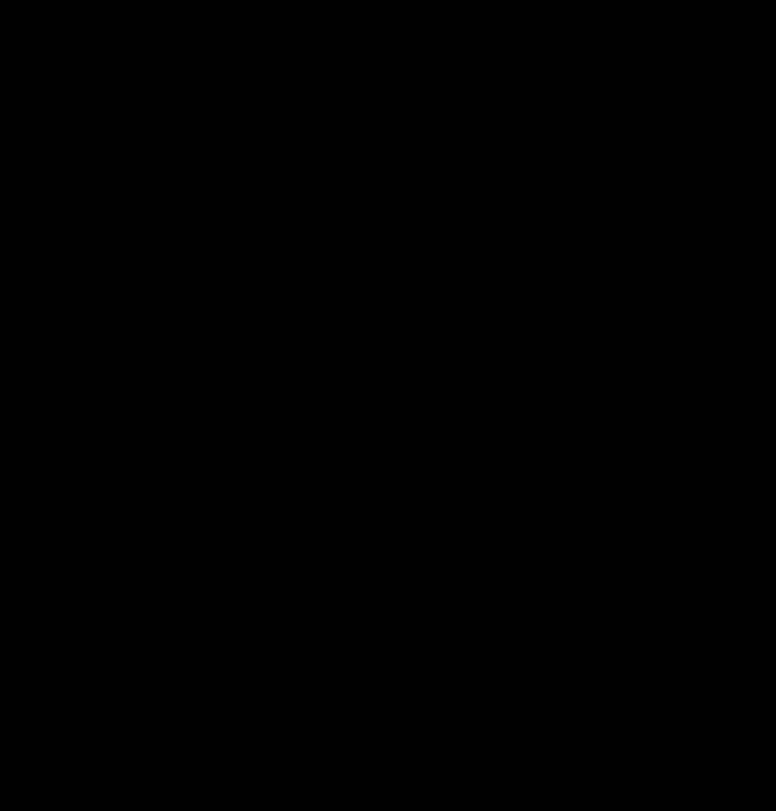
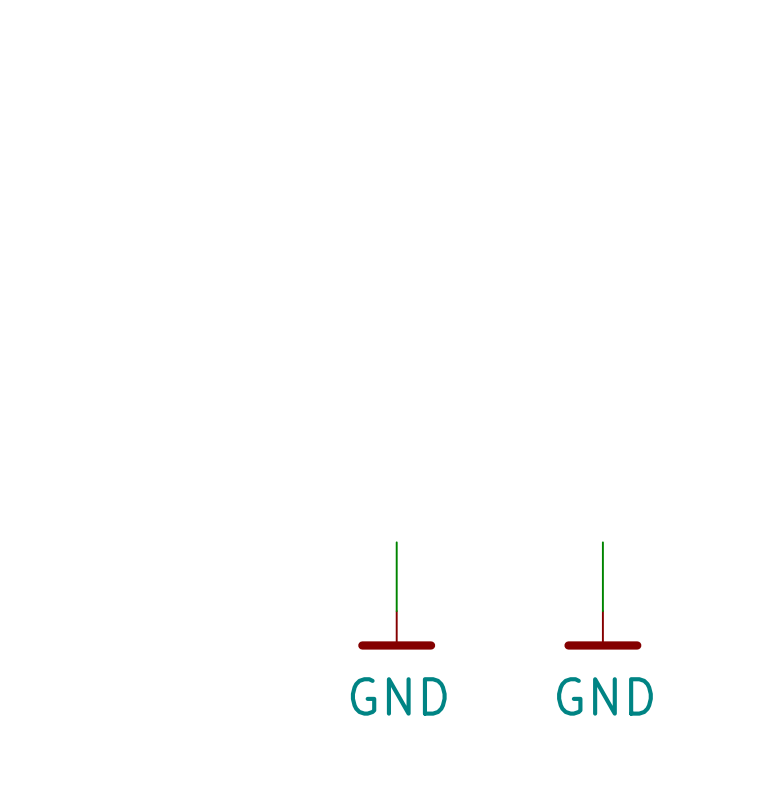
wire: none -> (396, 542) (396, 611)
wire: none -> (602, 542) (602, 611)
power symbol: none -> GND (396, 630)
power symbol: none -> GND (602, 630)

